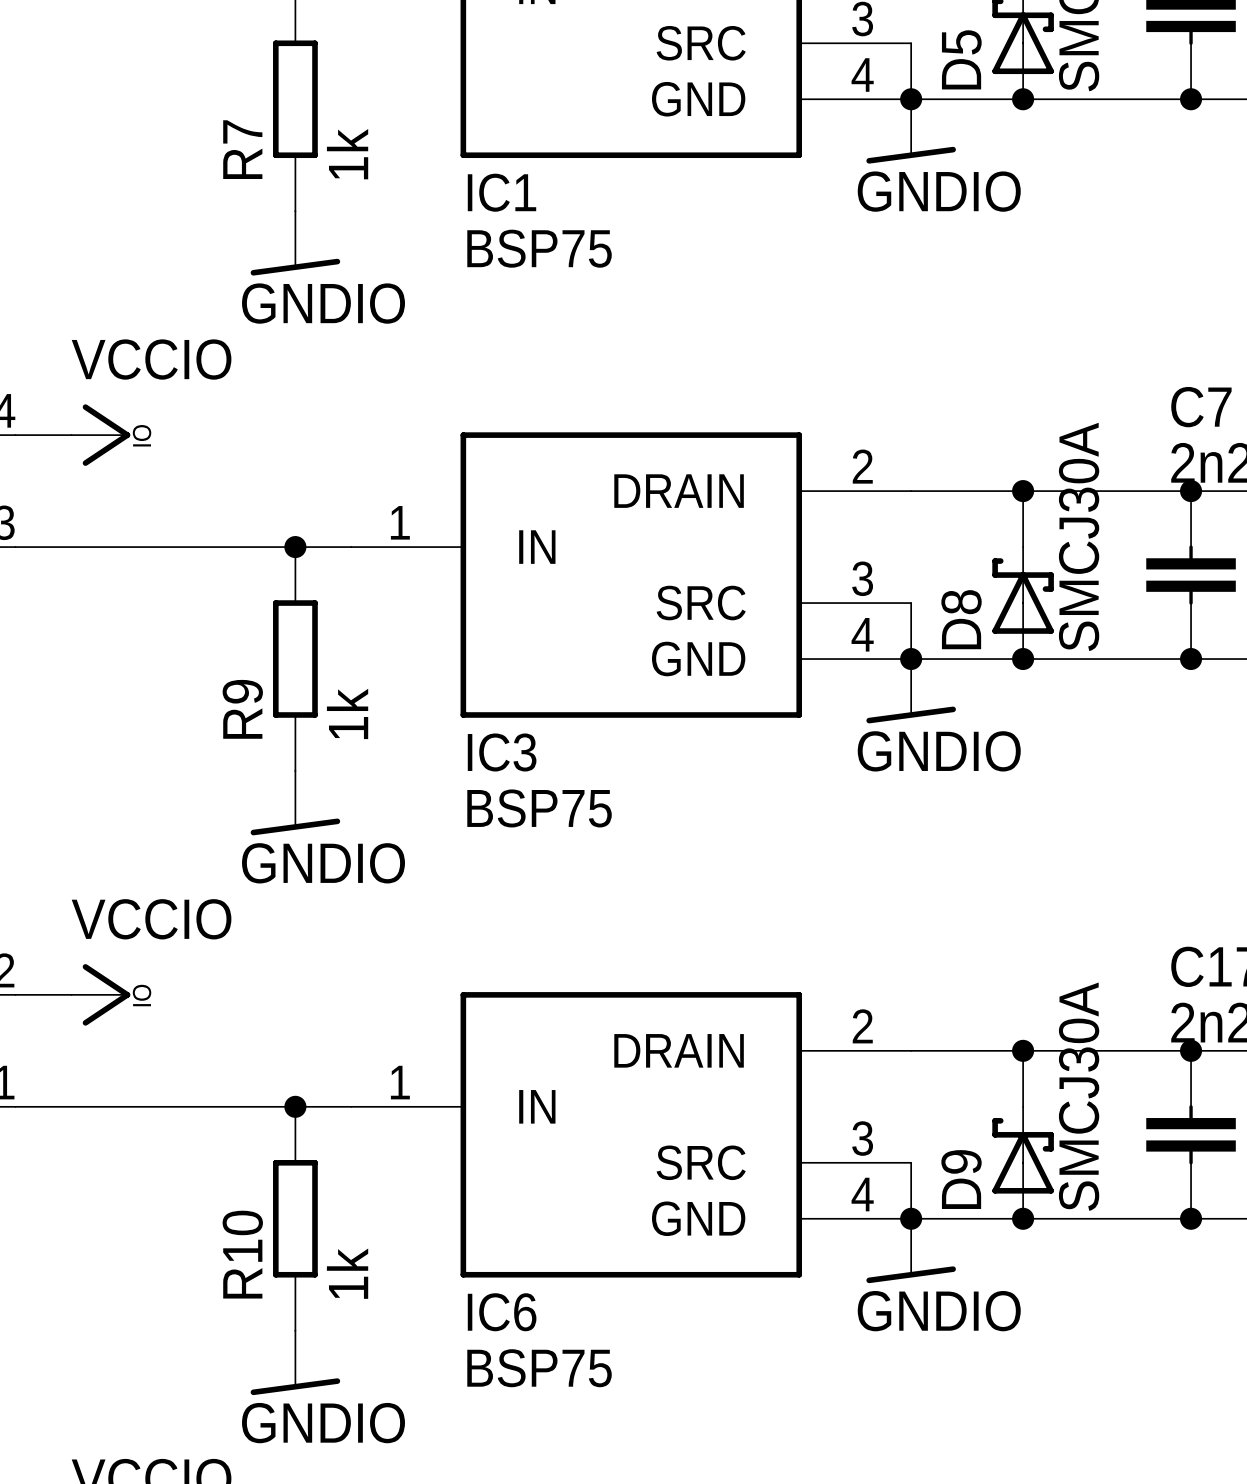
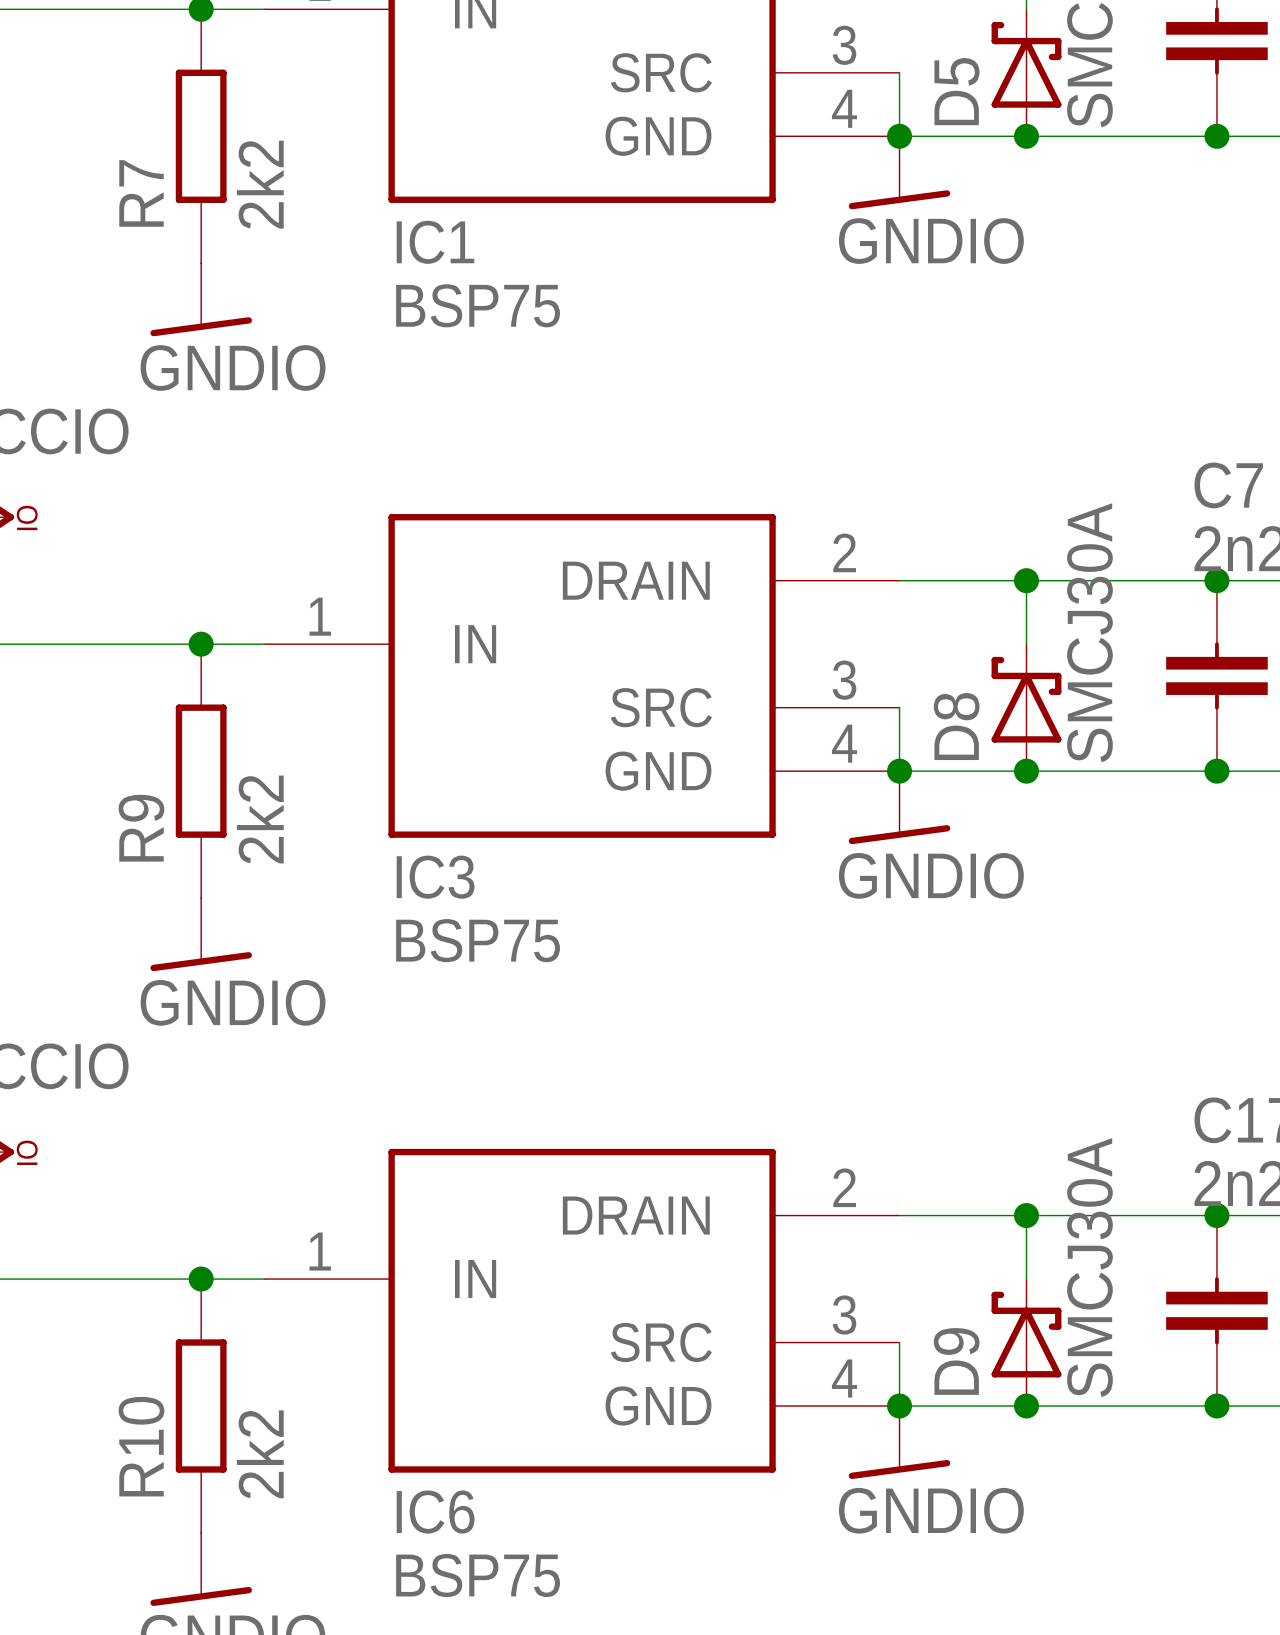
R7 value: 1k (347, 154) -> 2k2 (260, 184)
R9 value: 1k (347, 713) -> 2k2 (260, 819)
R10 value: 1k (347, 1273) -> 2k2 (260, 1454)

